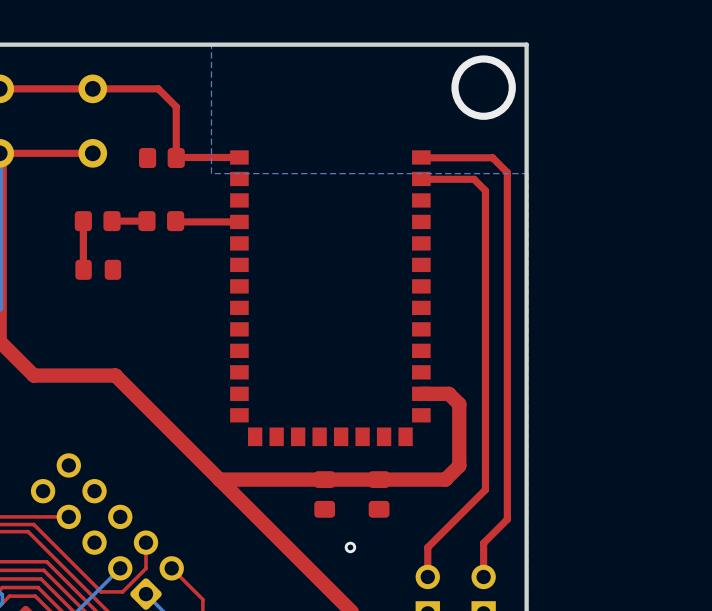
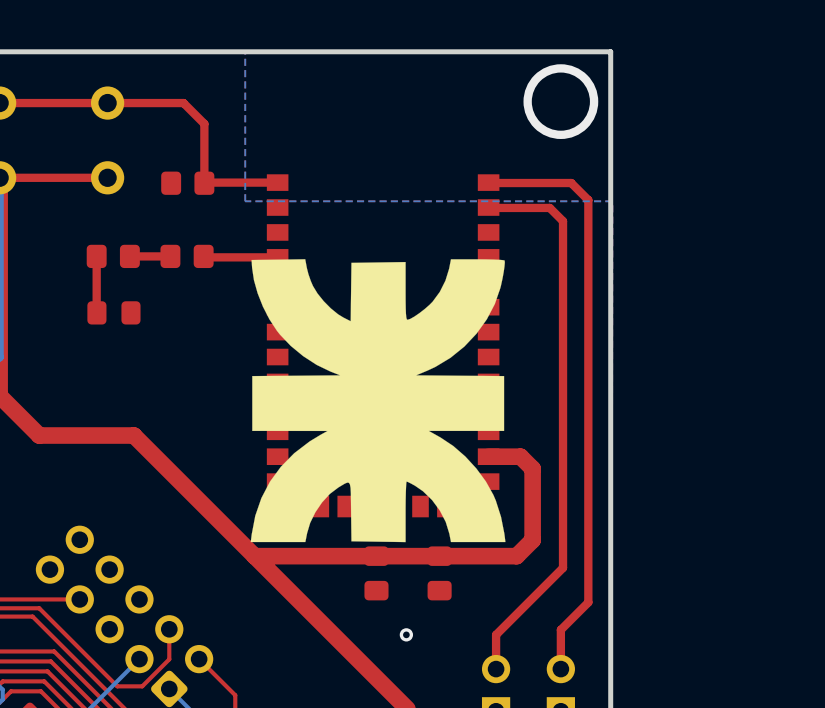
drawing: none -> [250, 259, 506, 543]

